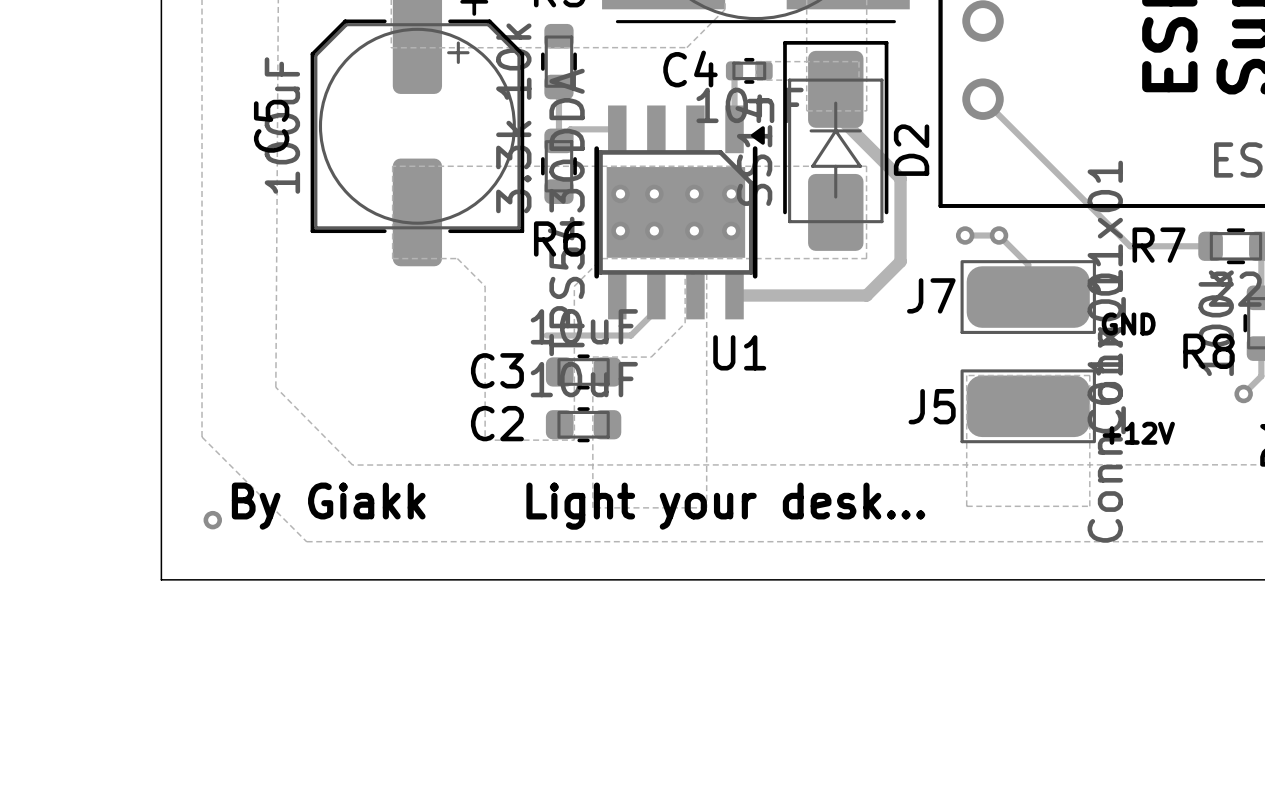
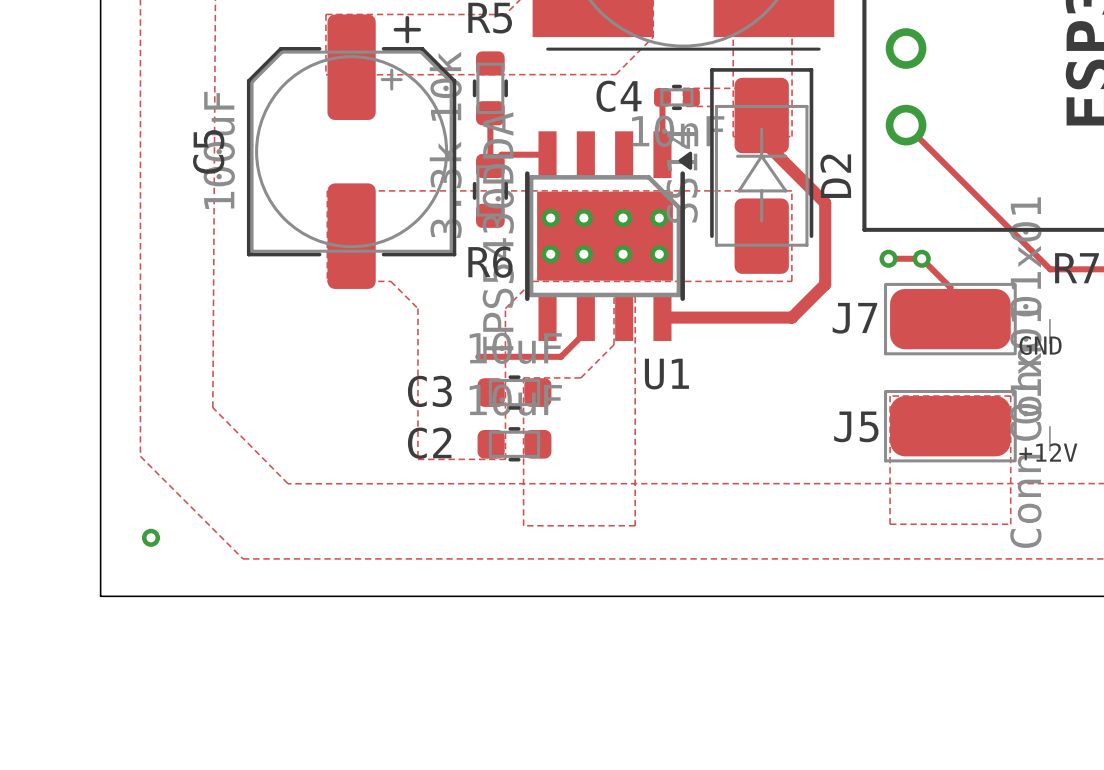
text: By Giakk Light your desk... (578, 506) -> none

